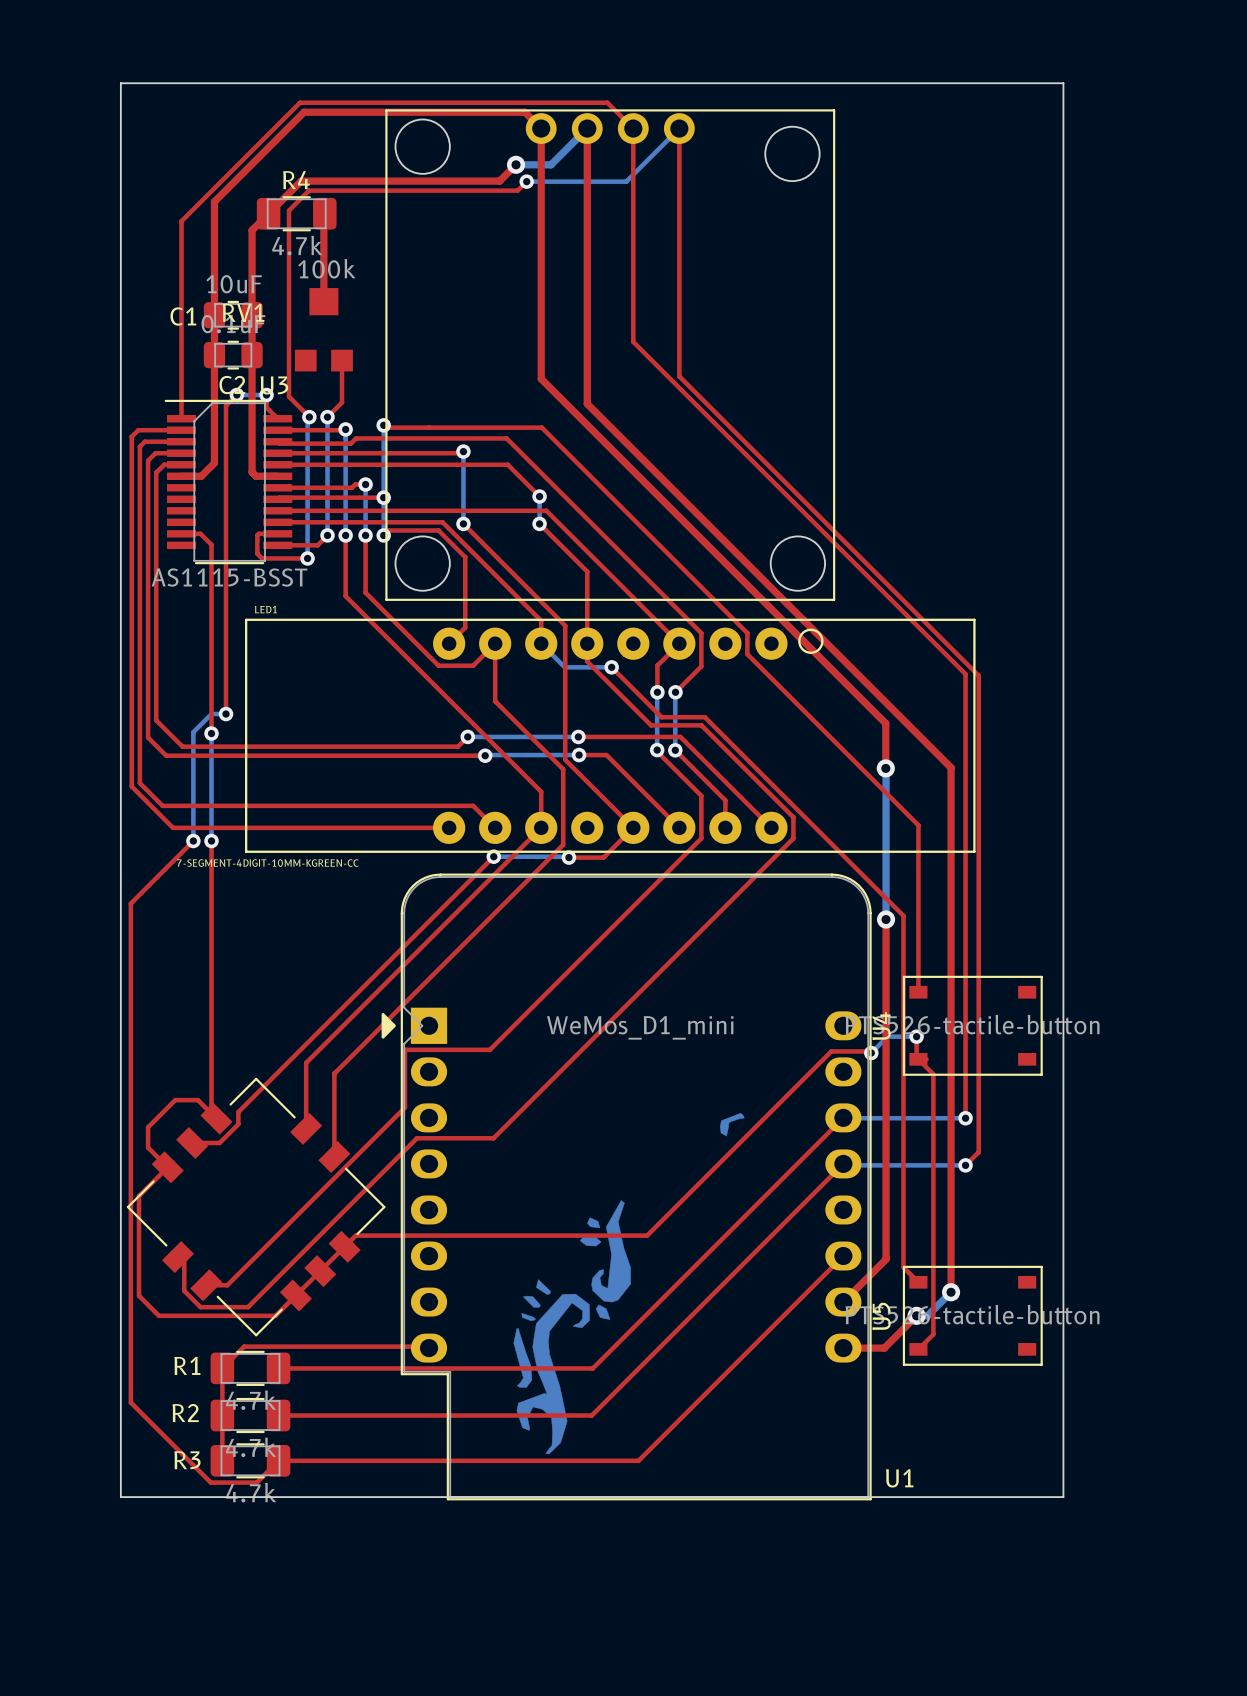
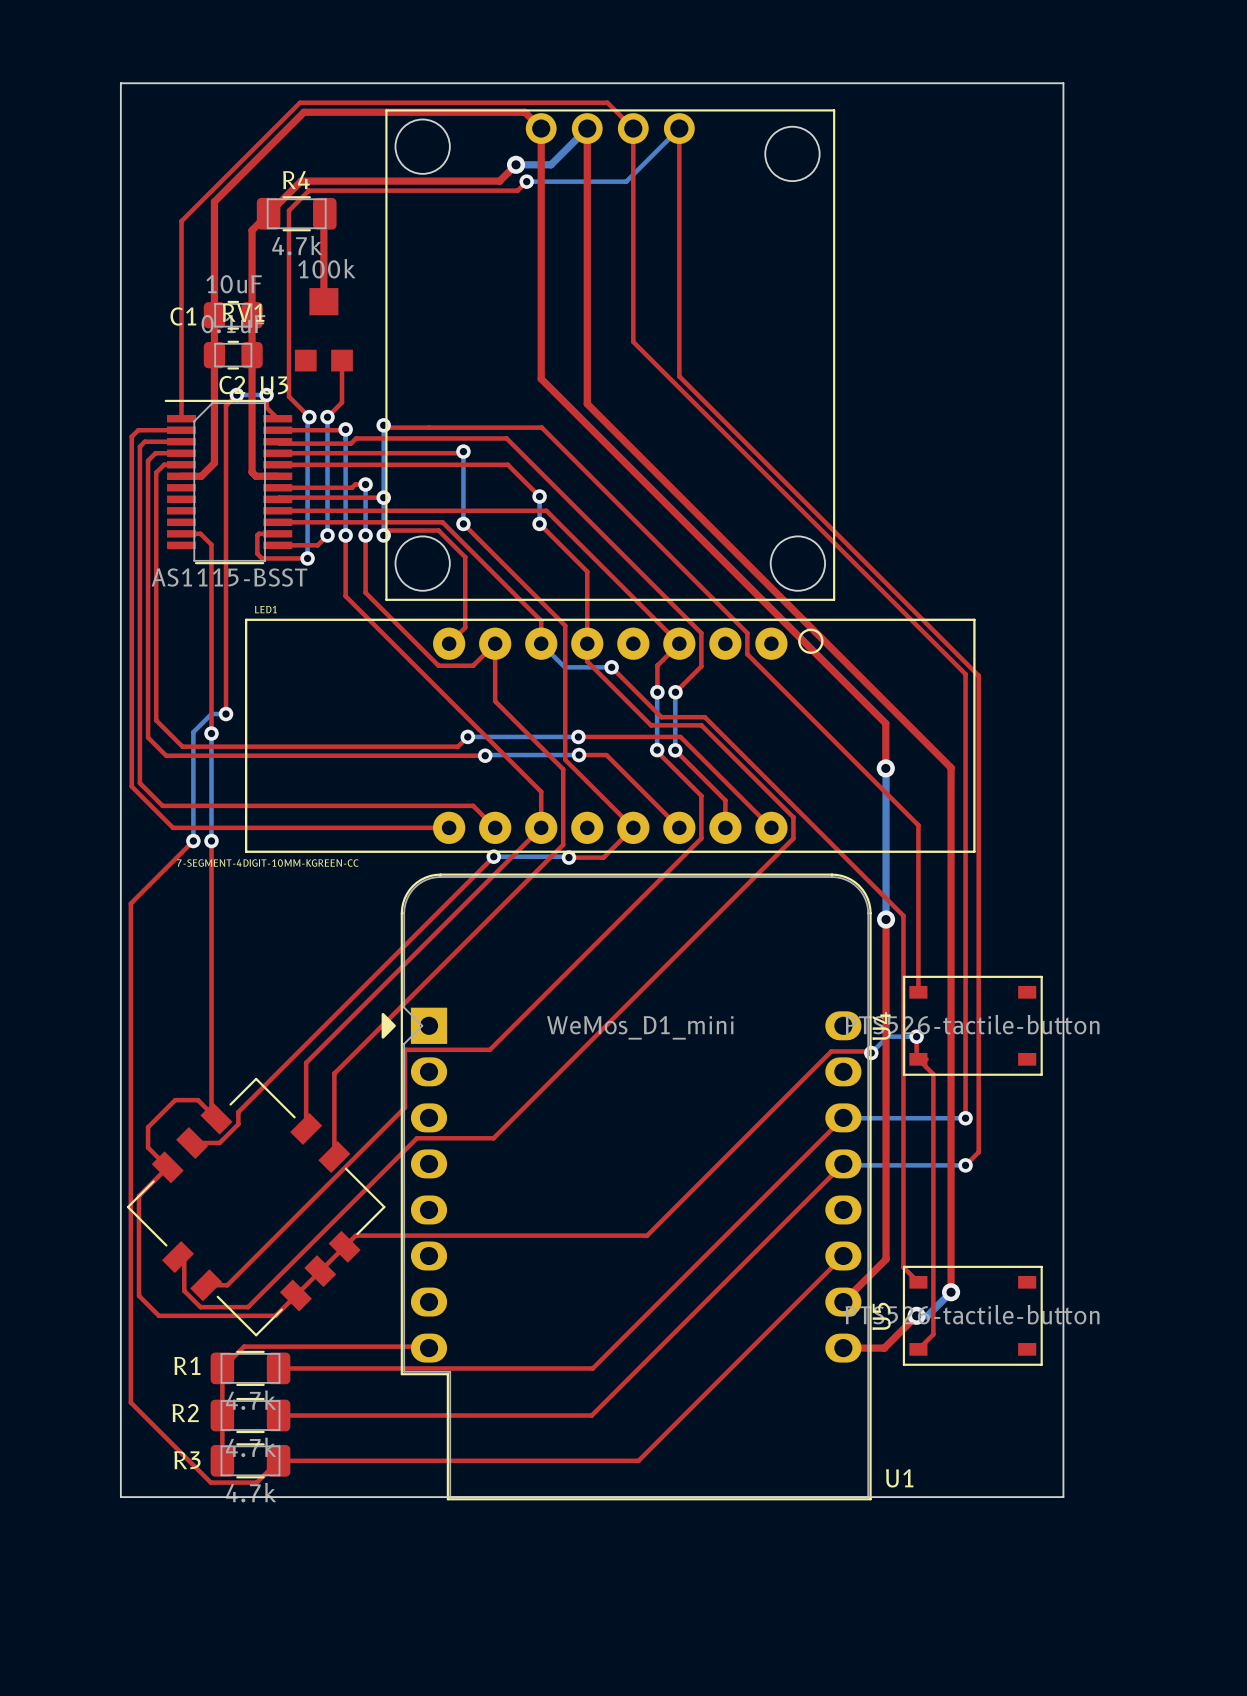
drawing: [513, 1112, 745, 1455] -> none

